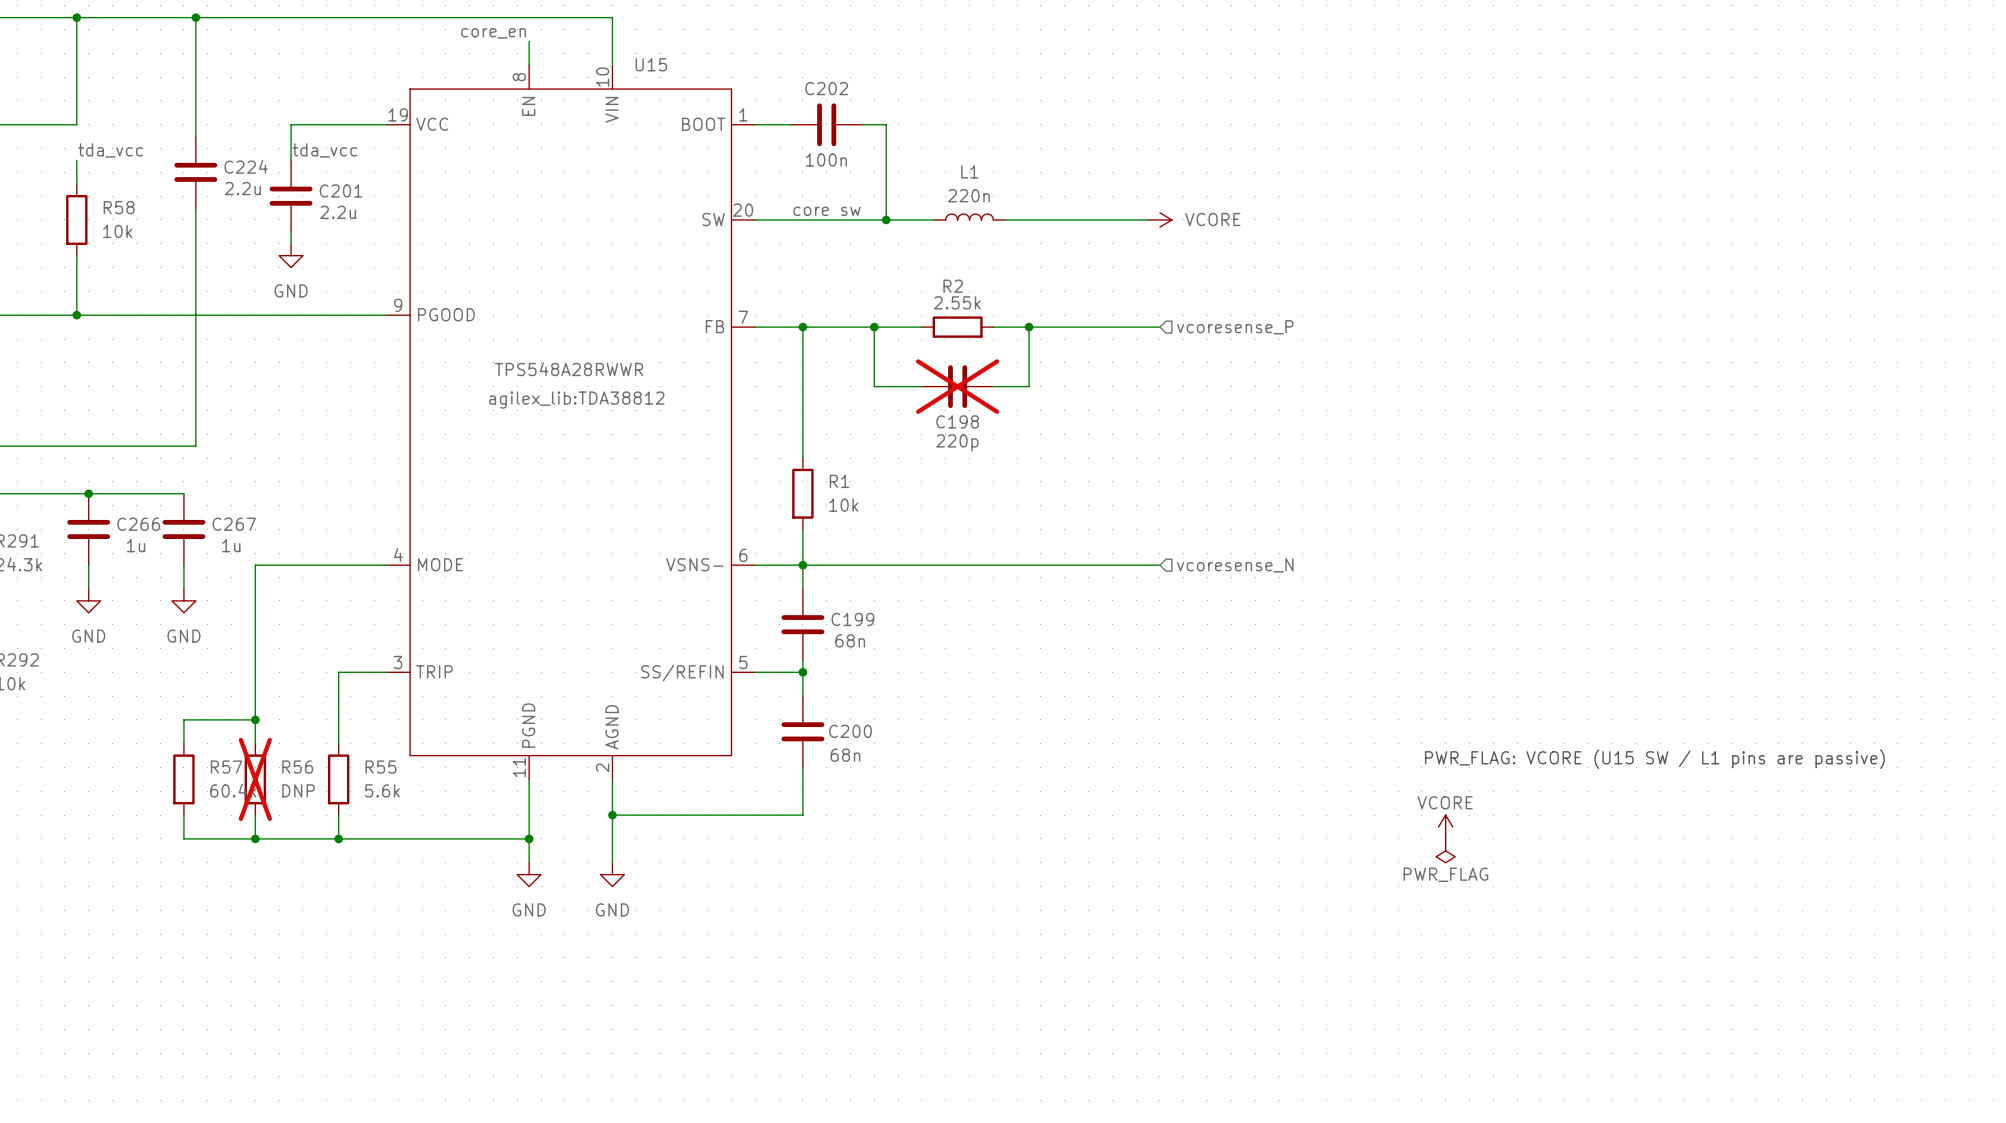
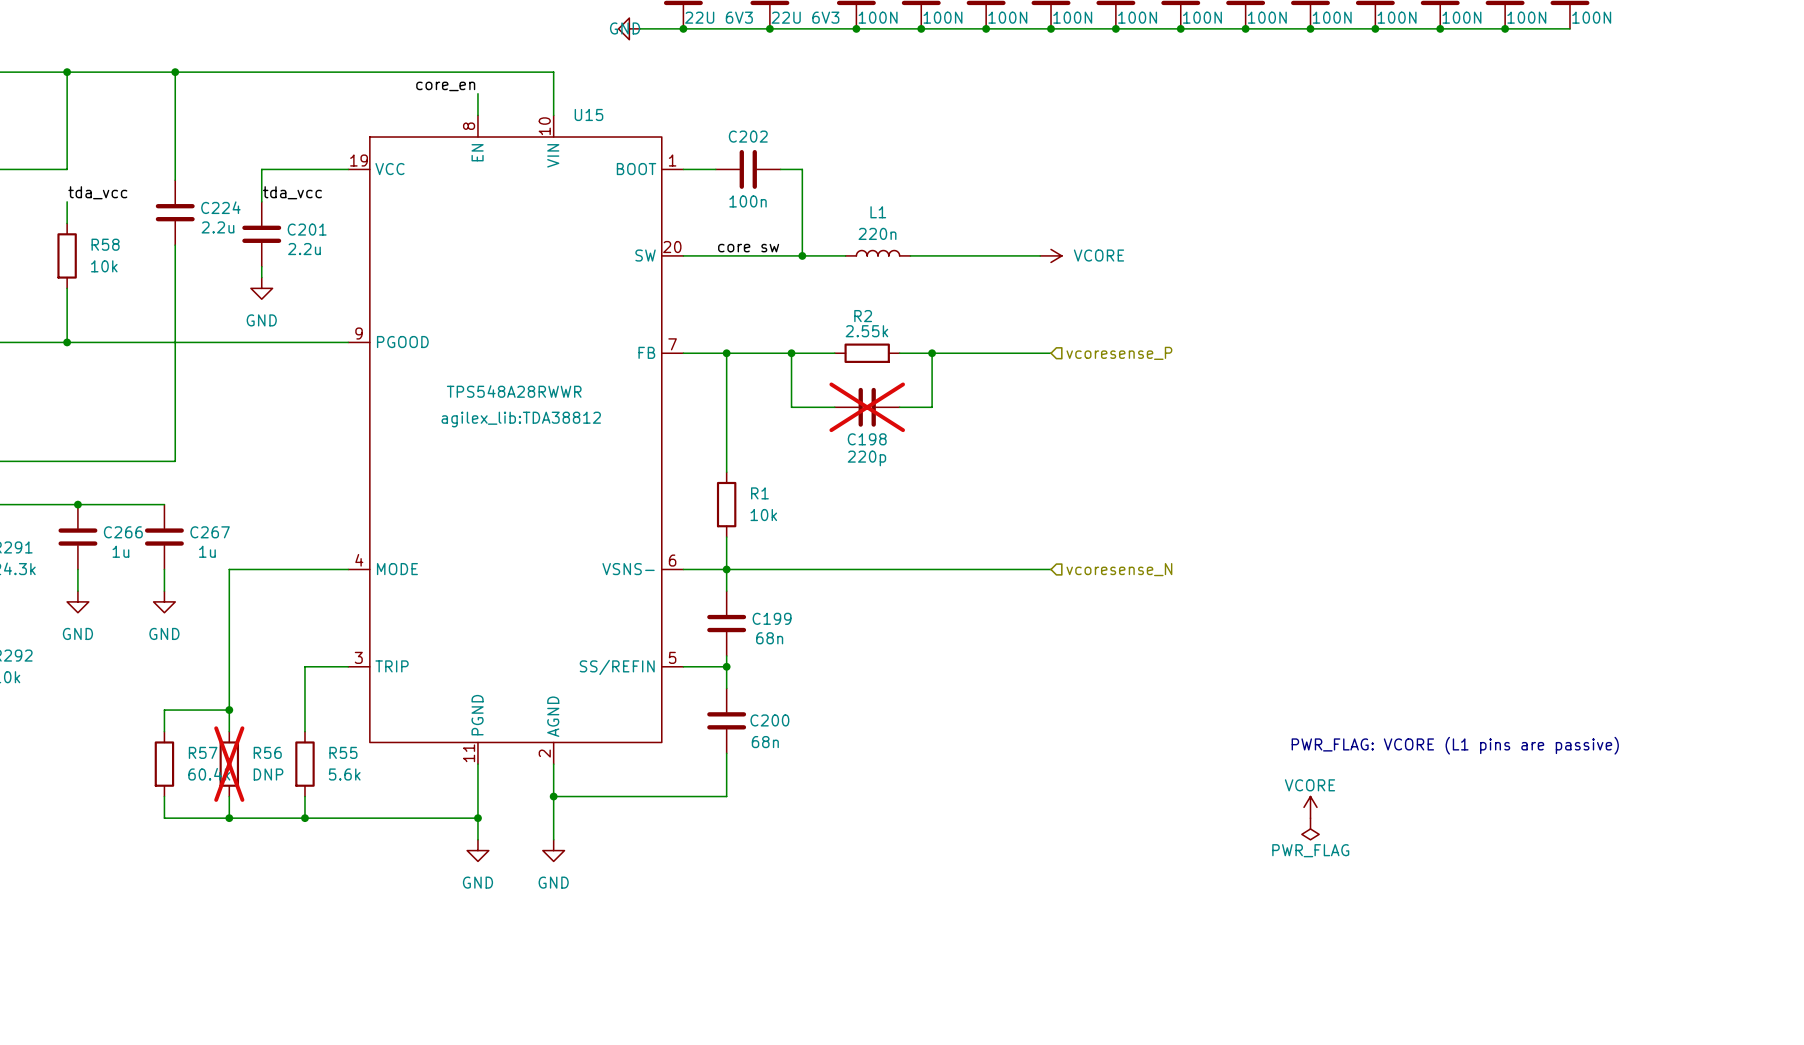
text: PWR_FLAG: VCORE (U15 SW / L1 pins are passive) (1654, 759) -> PWR_FLAG: VCORE (L1 pins are passive) (1455, 745)

